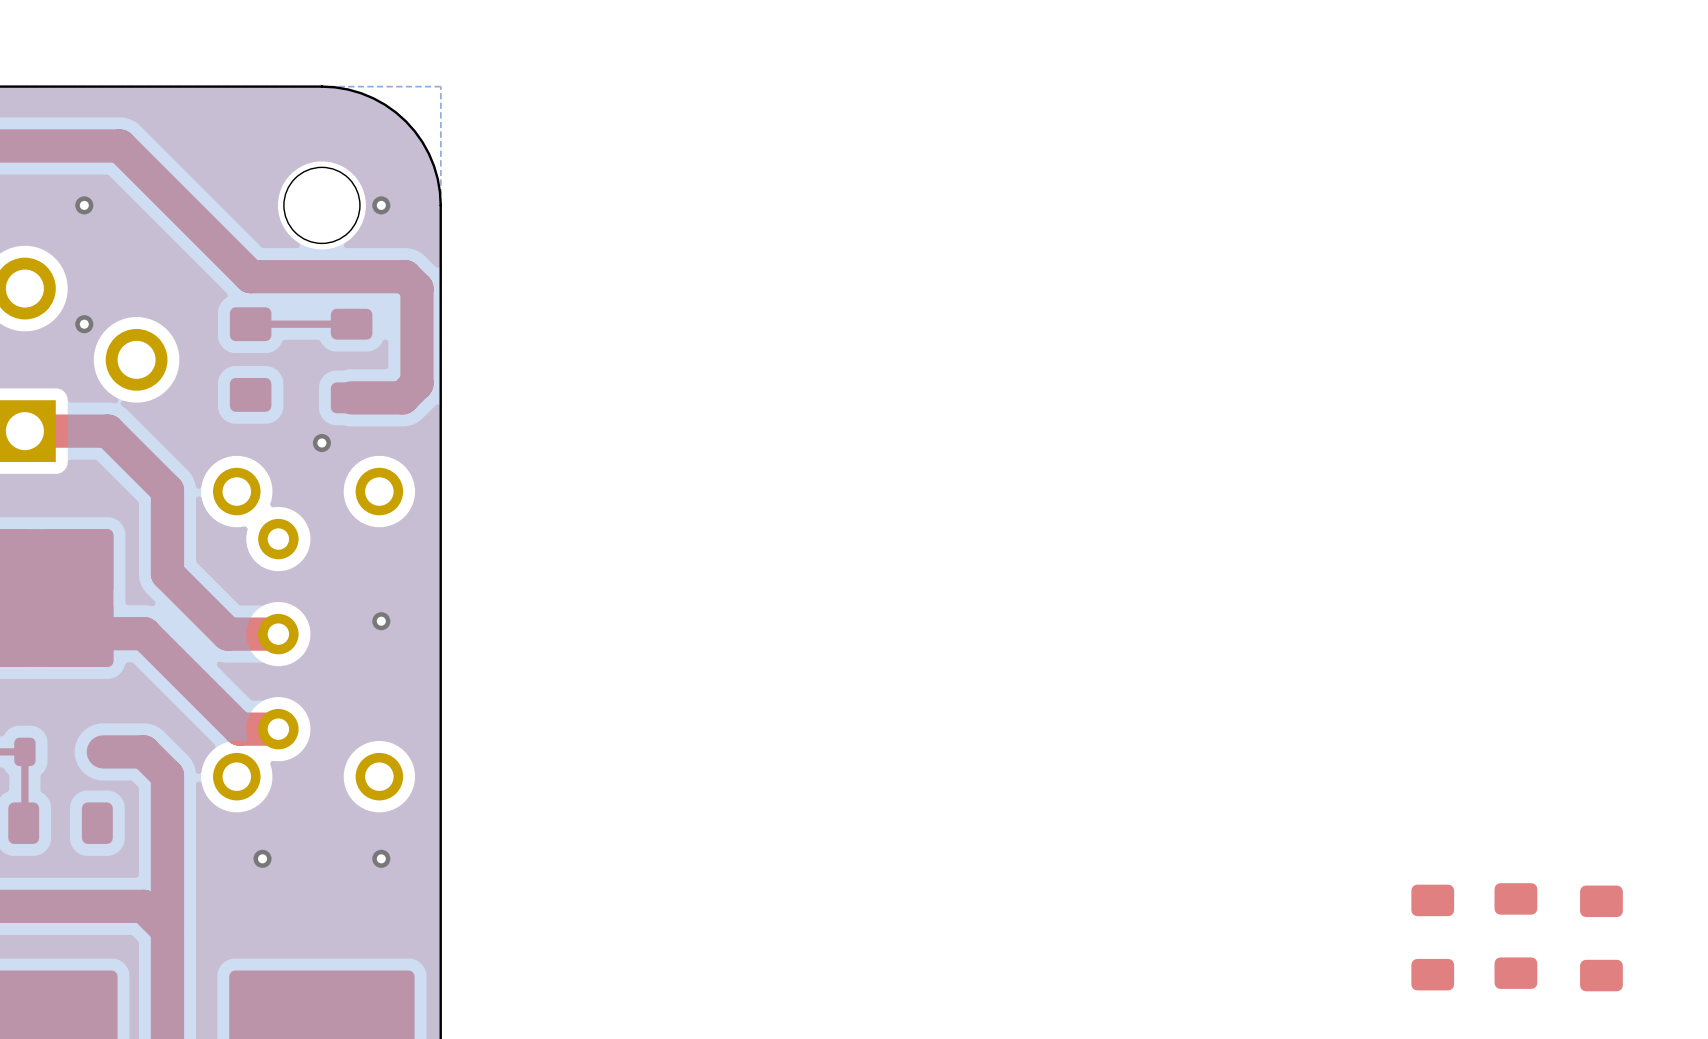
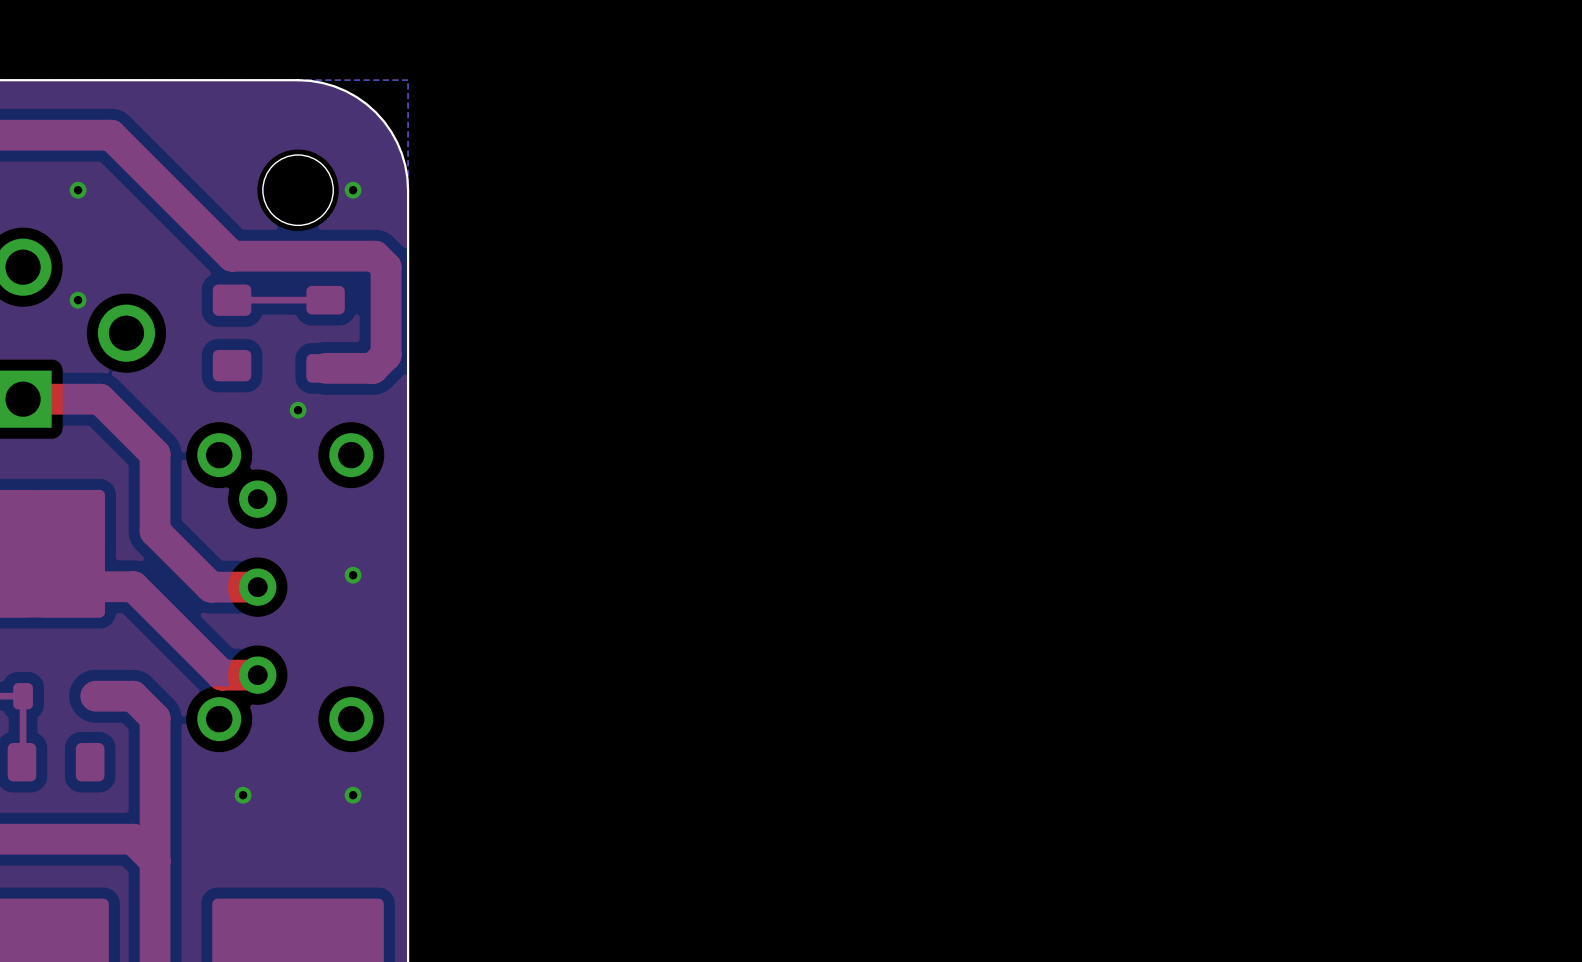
part: (1515, 936) -> none
part: (1432, 937) -> none
part: (1601, 938) -> none

